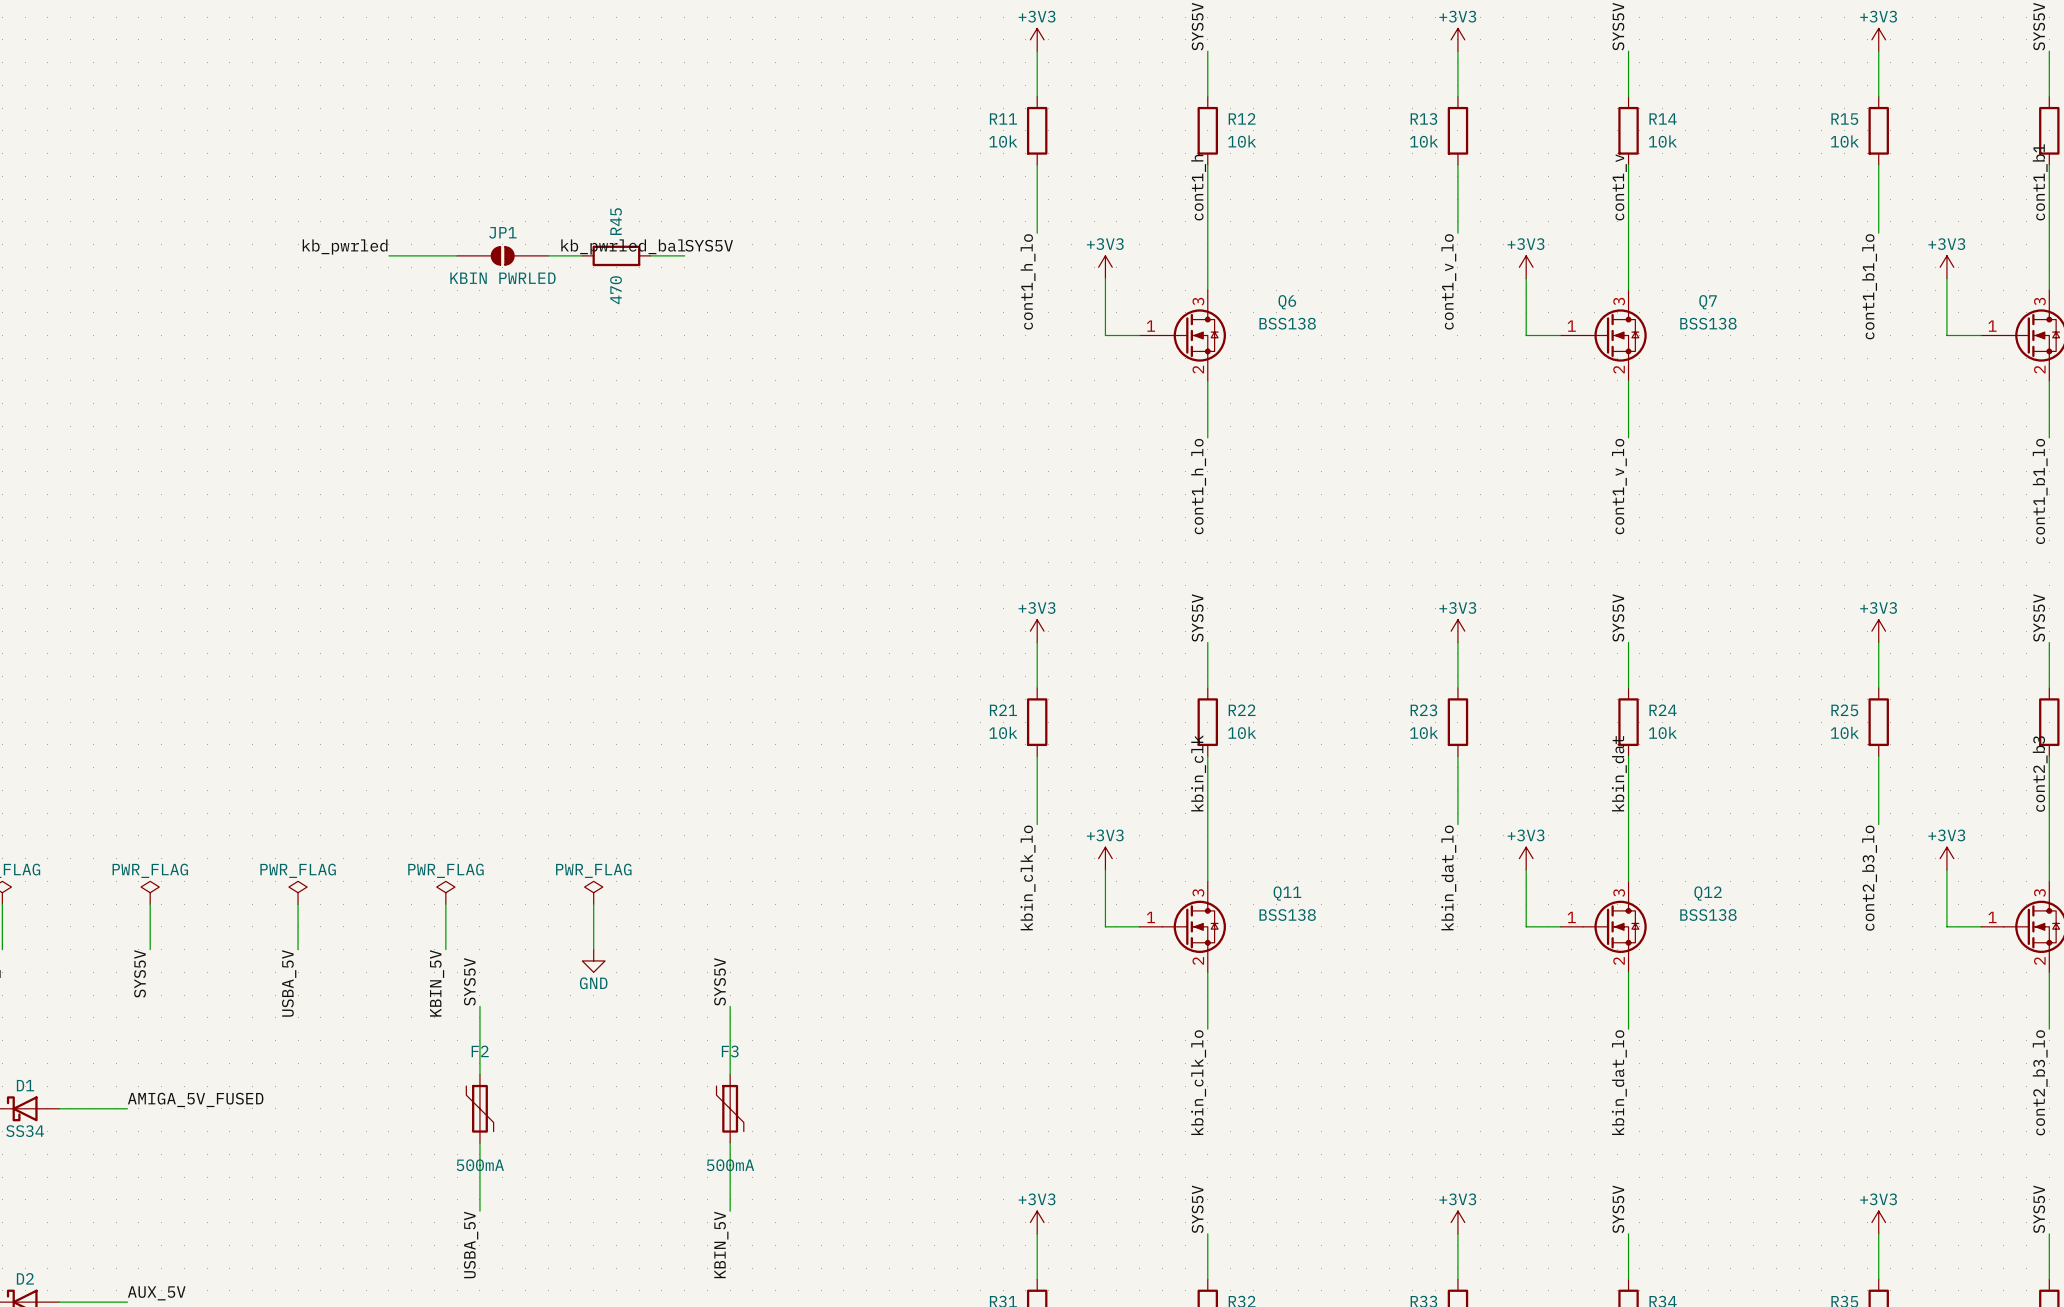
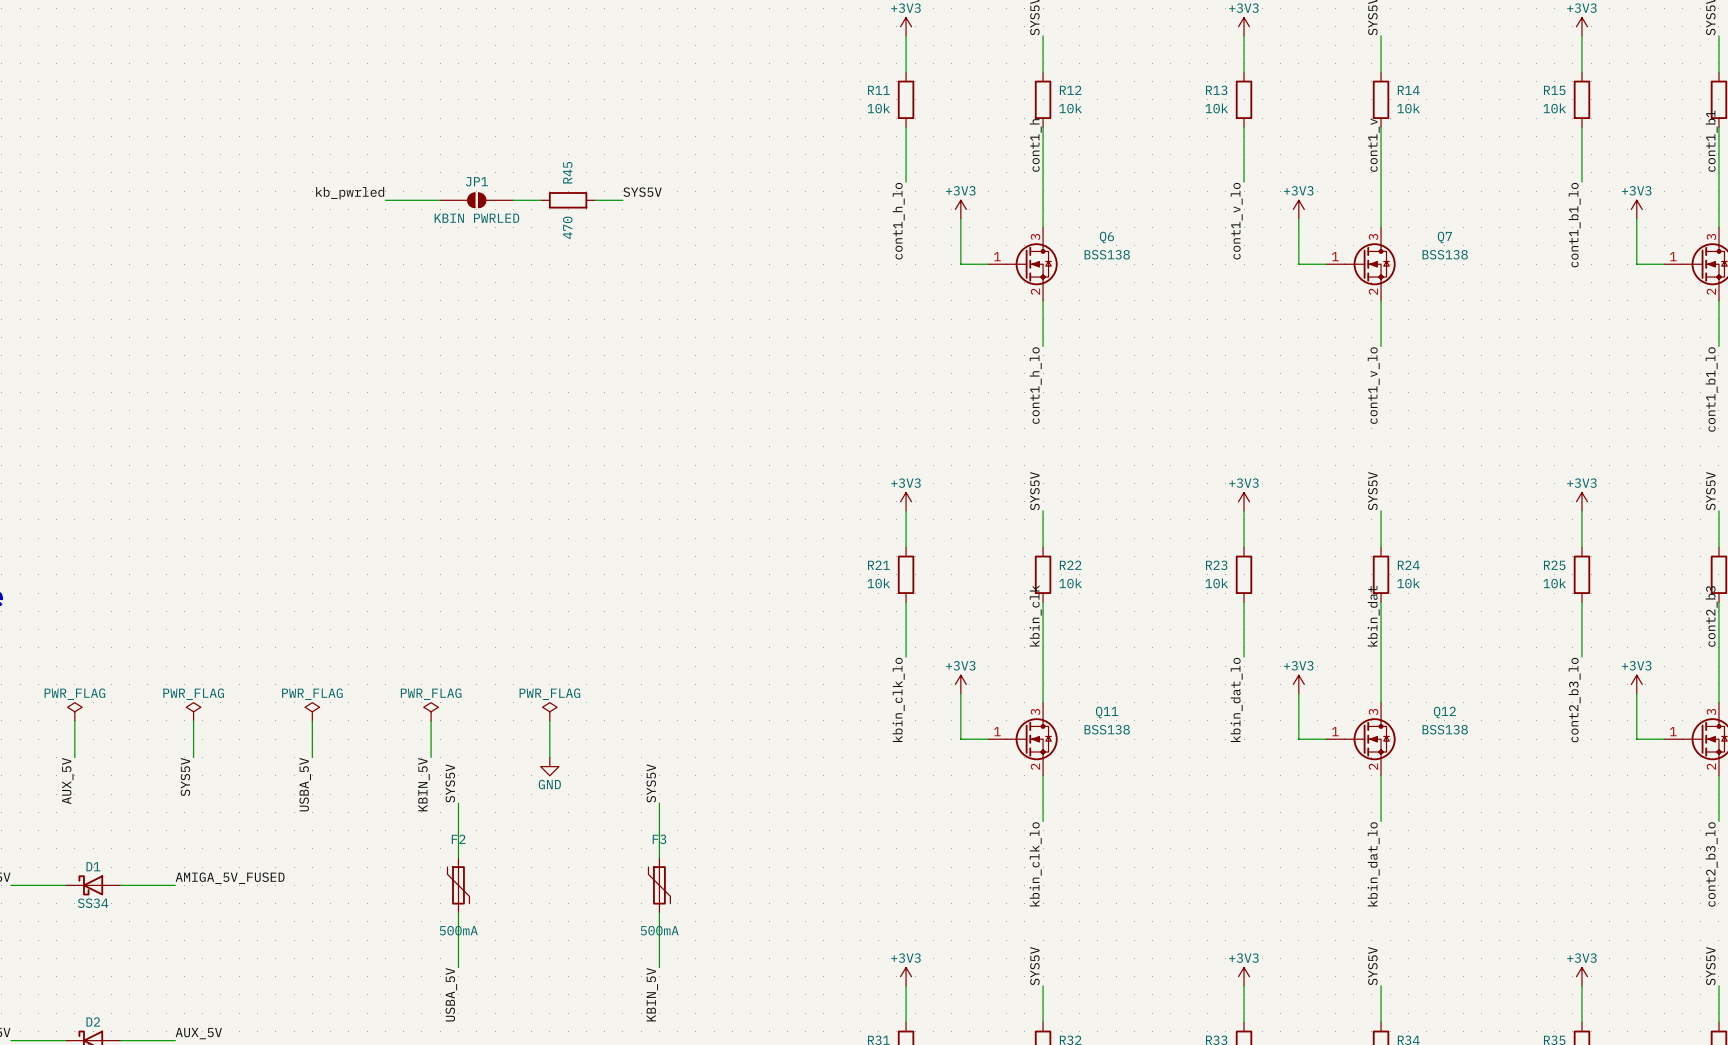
label: kb_pwrled_bal (623, 247) -> none

